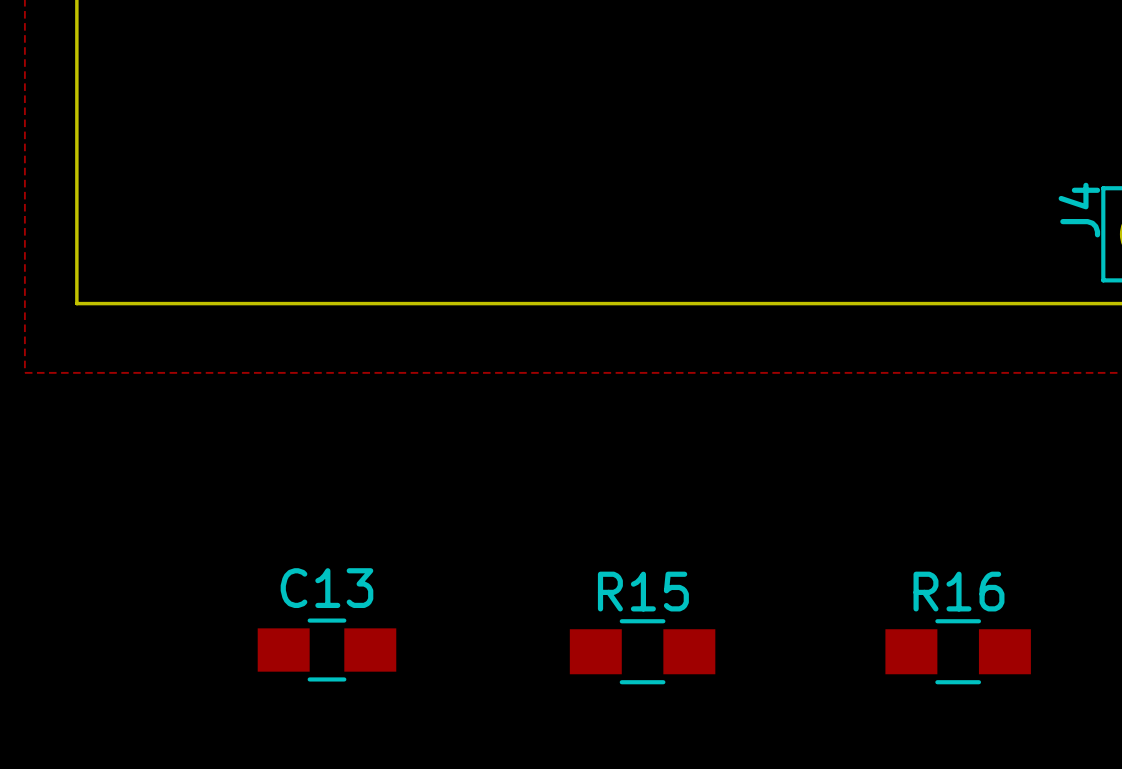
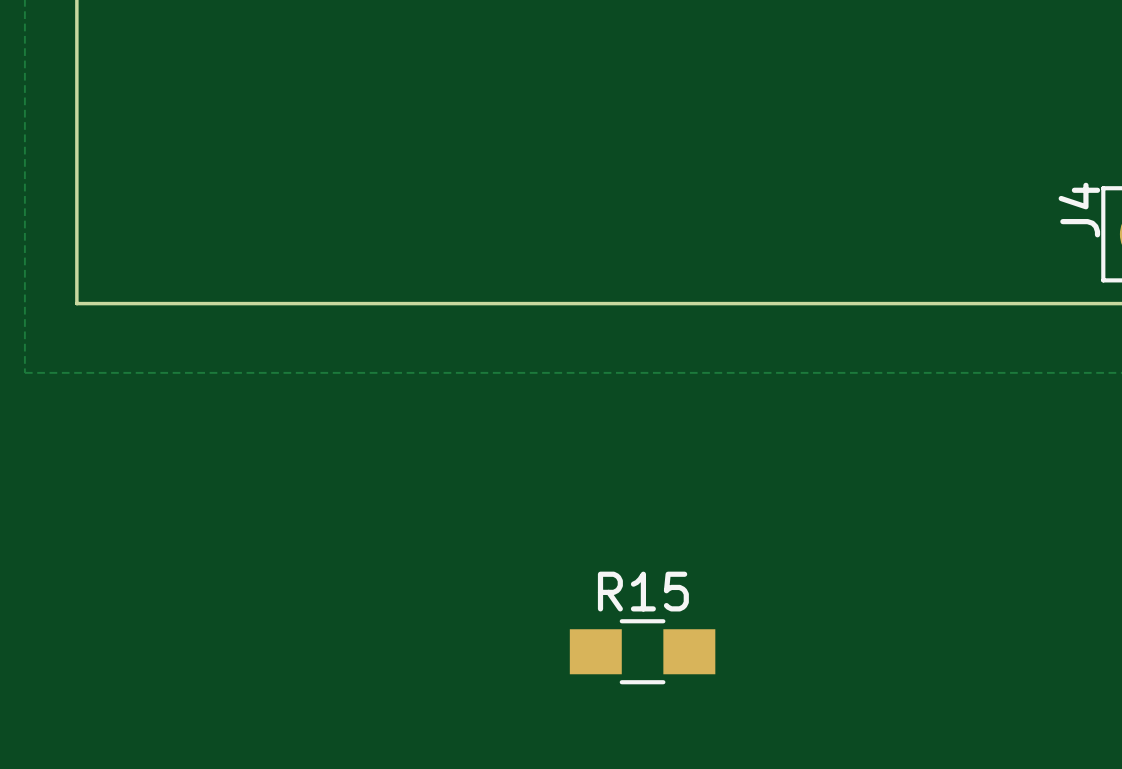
C13: (326, 650) -> none
R16: (958, 651) -> none

